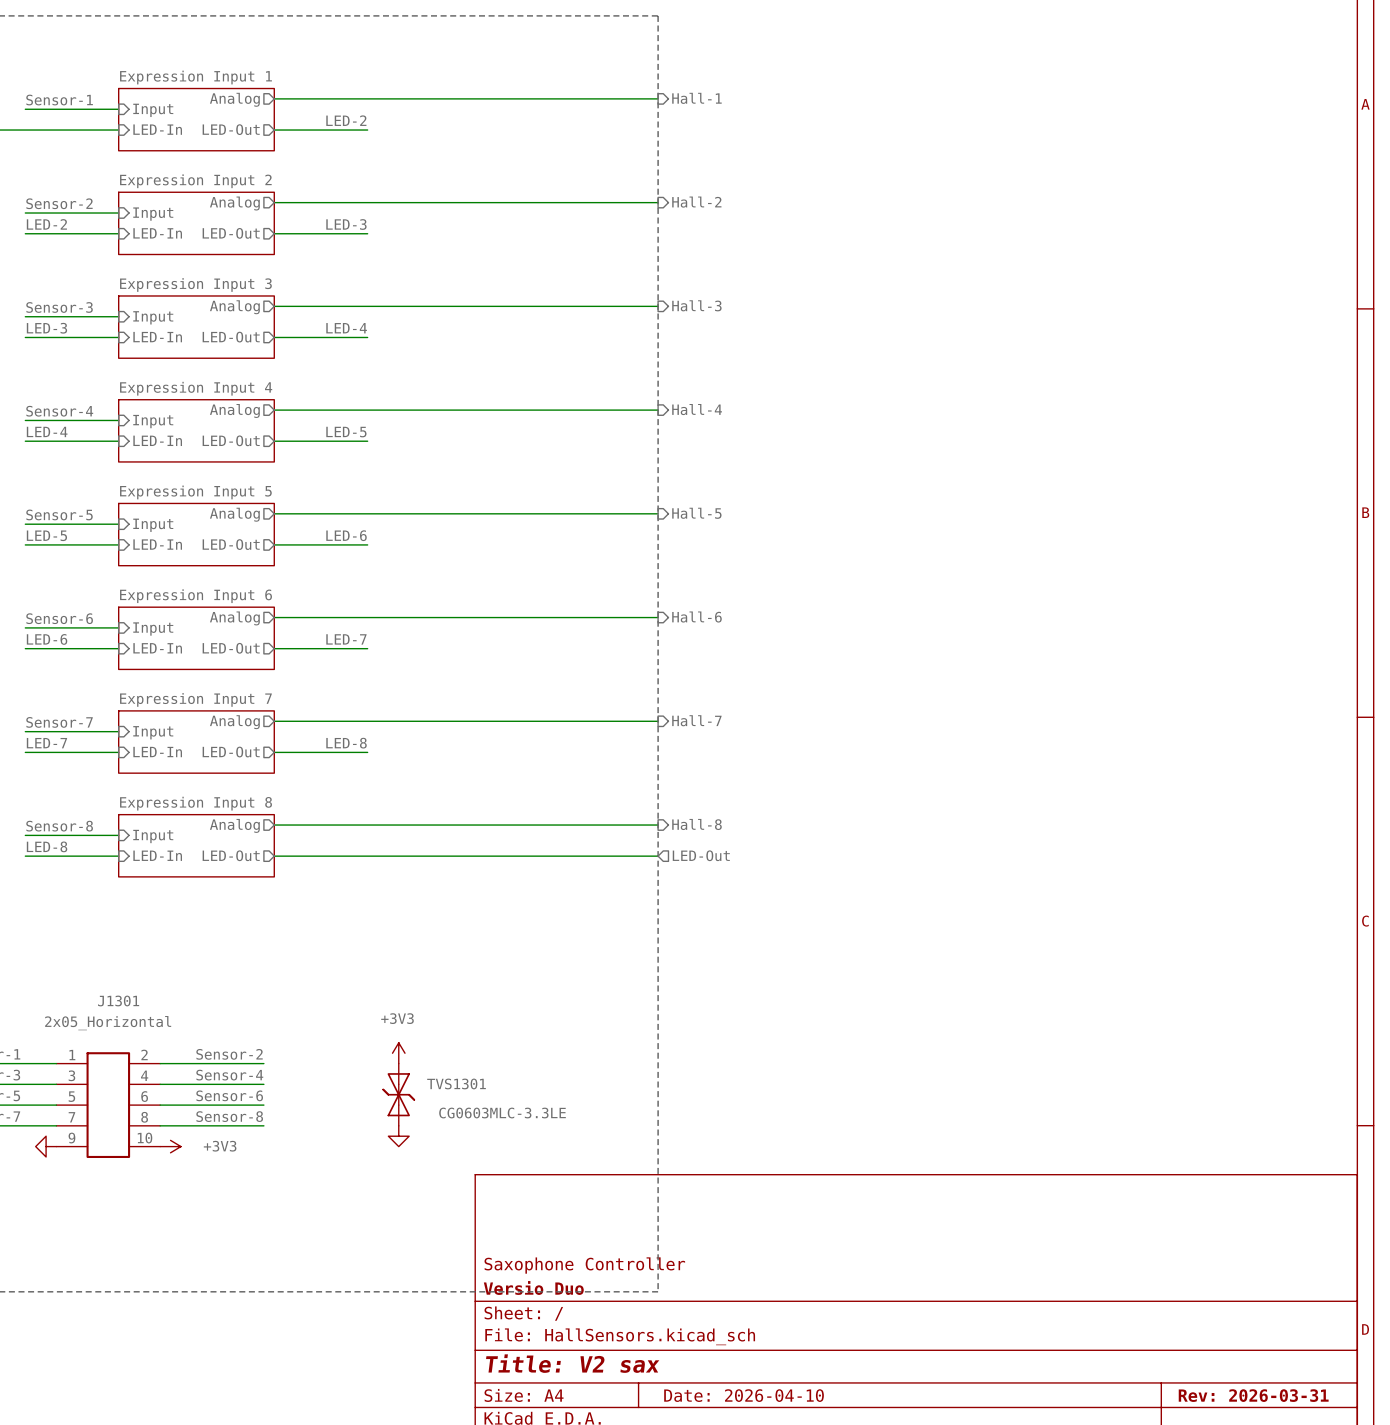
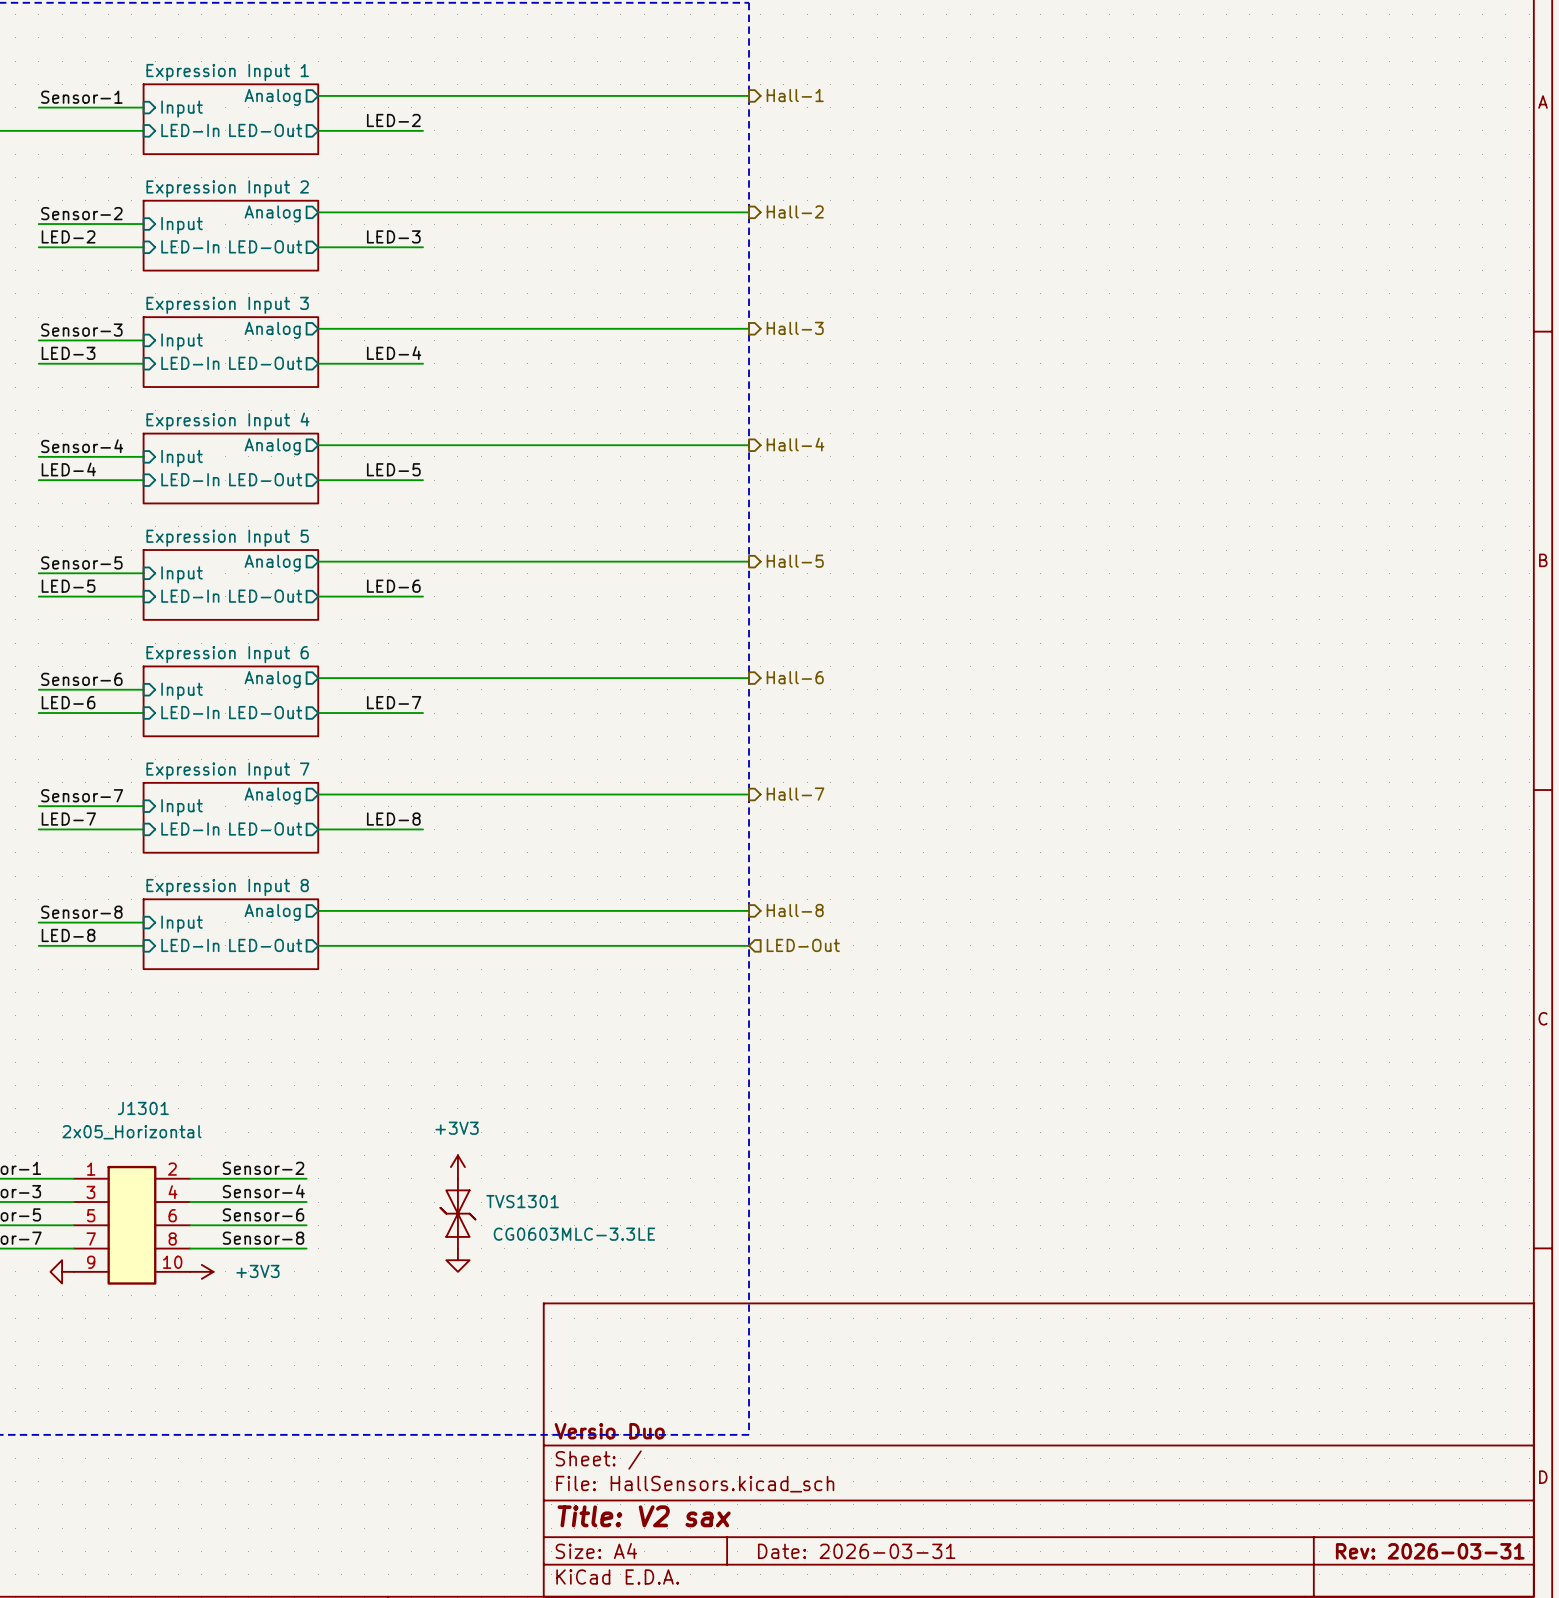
title block: Saxophone Controller (584, 1265) -> none
title block: Date: 2026-04-10 (744, 1395) -> Date: 2026-03-31 (856, 1551)

